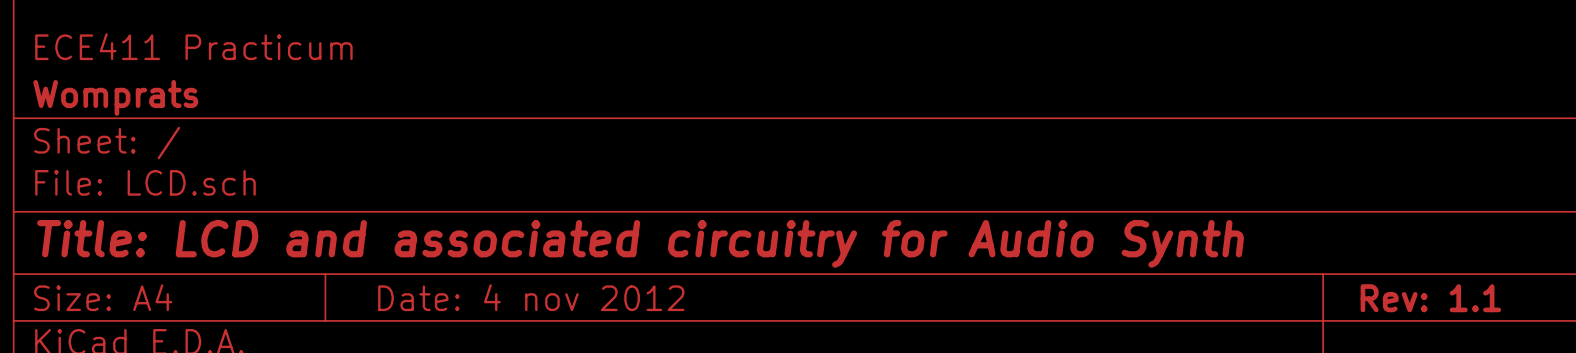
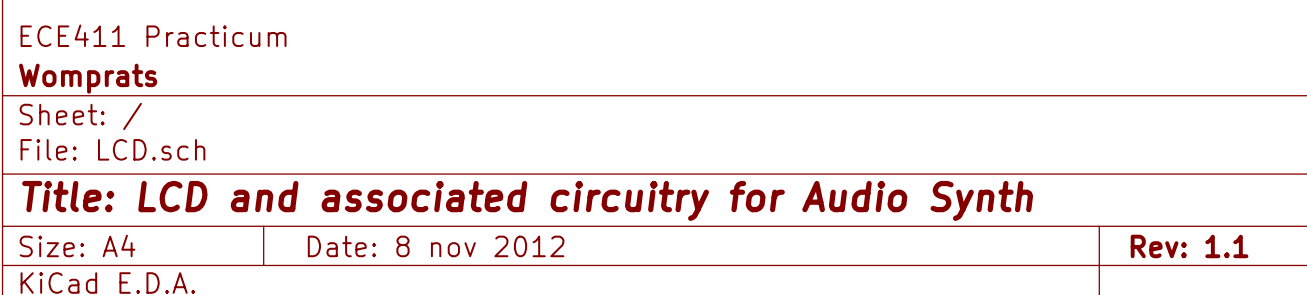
title block: Date: 4 nov 2012 (531, 297) -> Date: 8 nov 2012 (436, 246)

